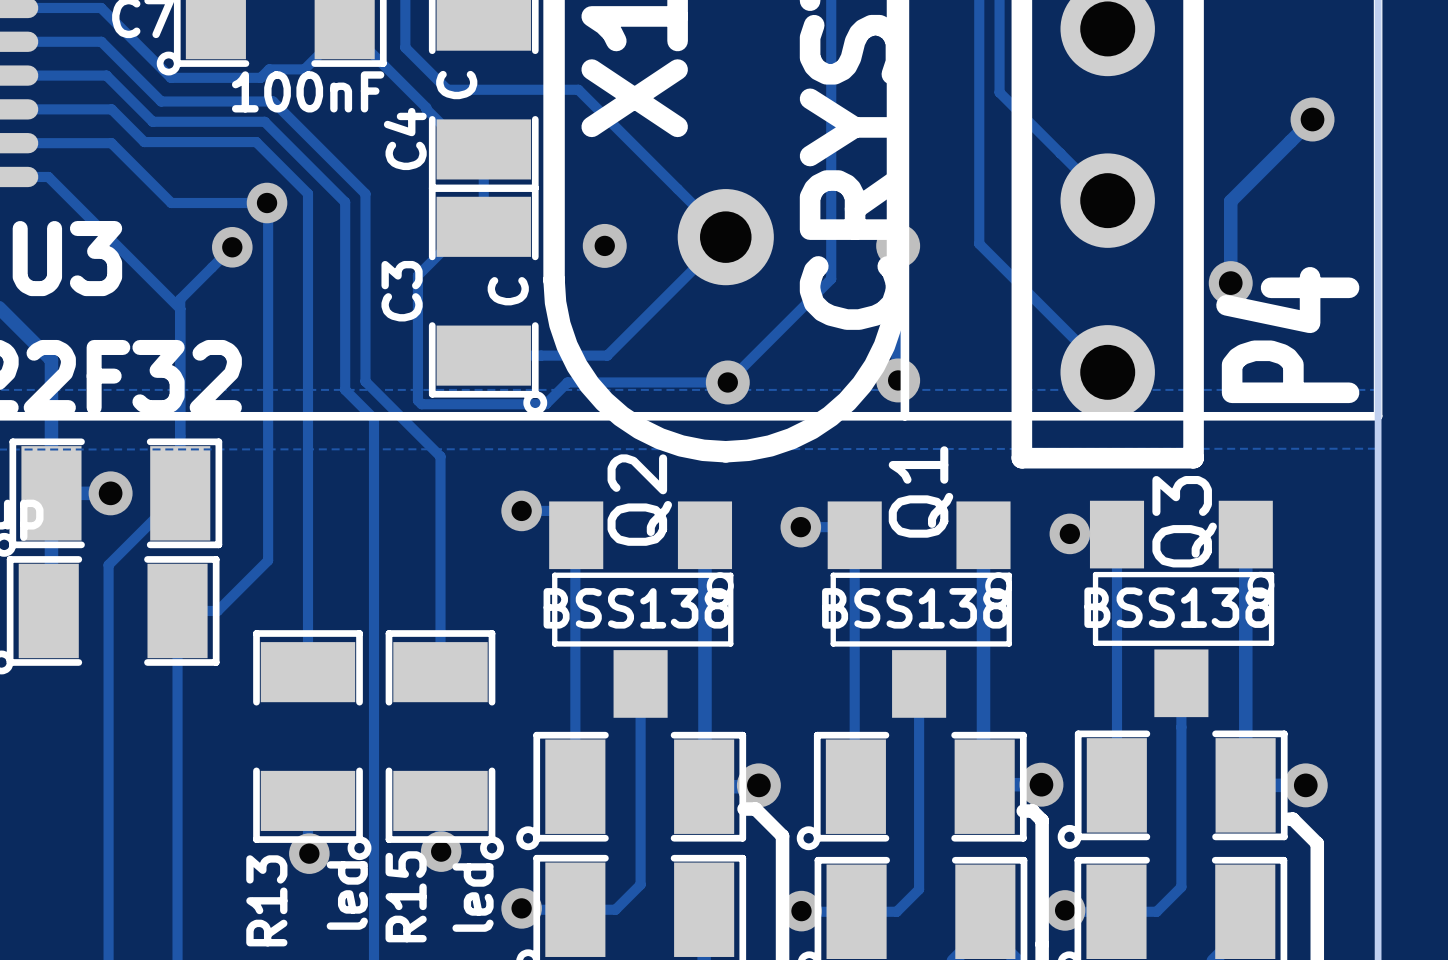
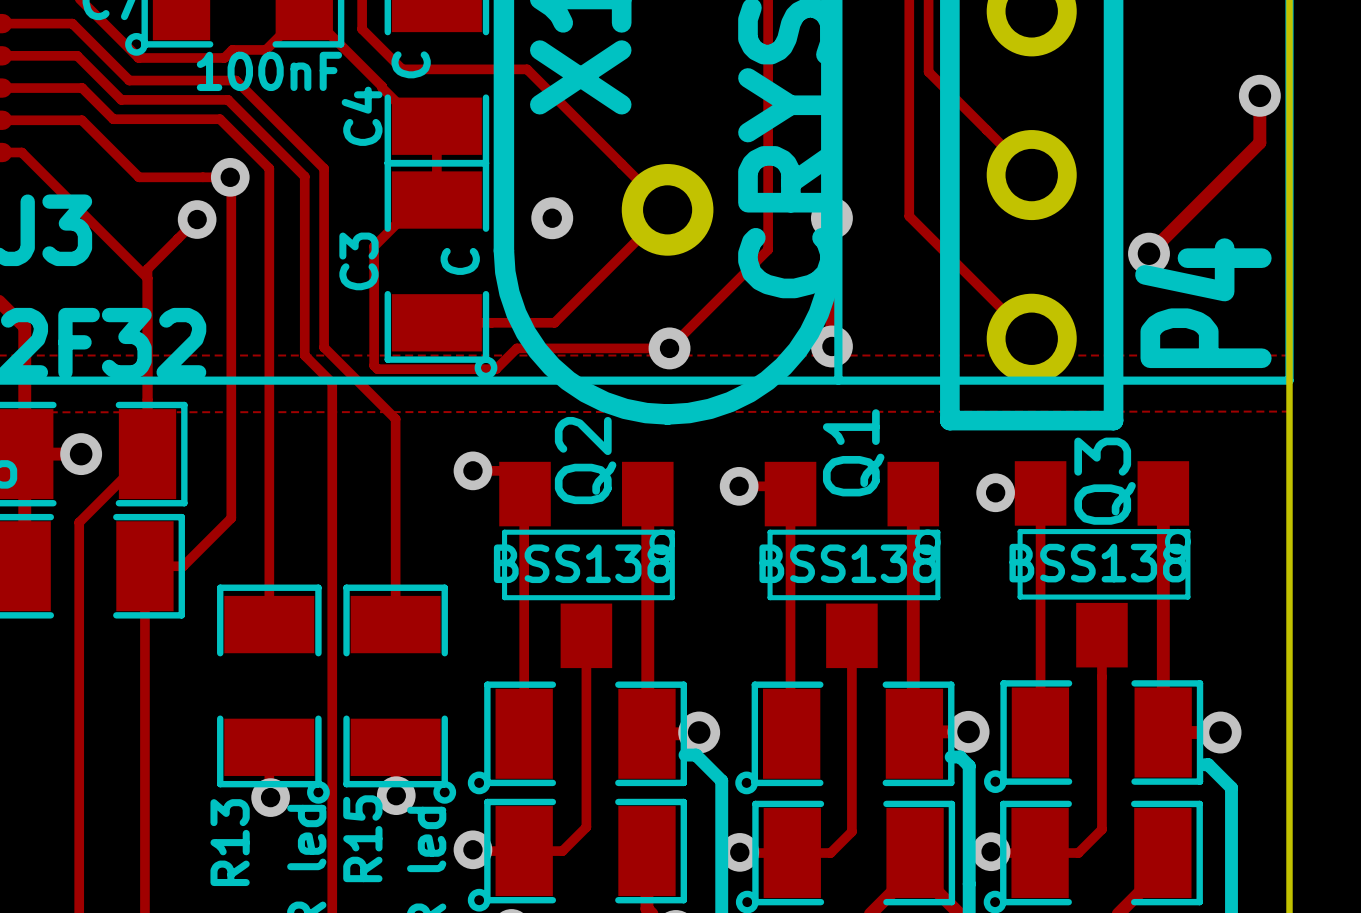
track: (1312, 119) (1230, 201) (1230, 283) -> (1259, 95) (1259, 142) (1149, 253)
via position: (1312, 119) -> (1259, 95)

